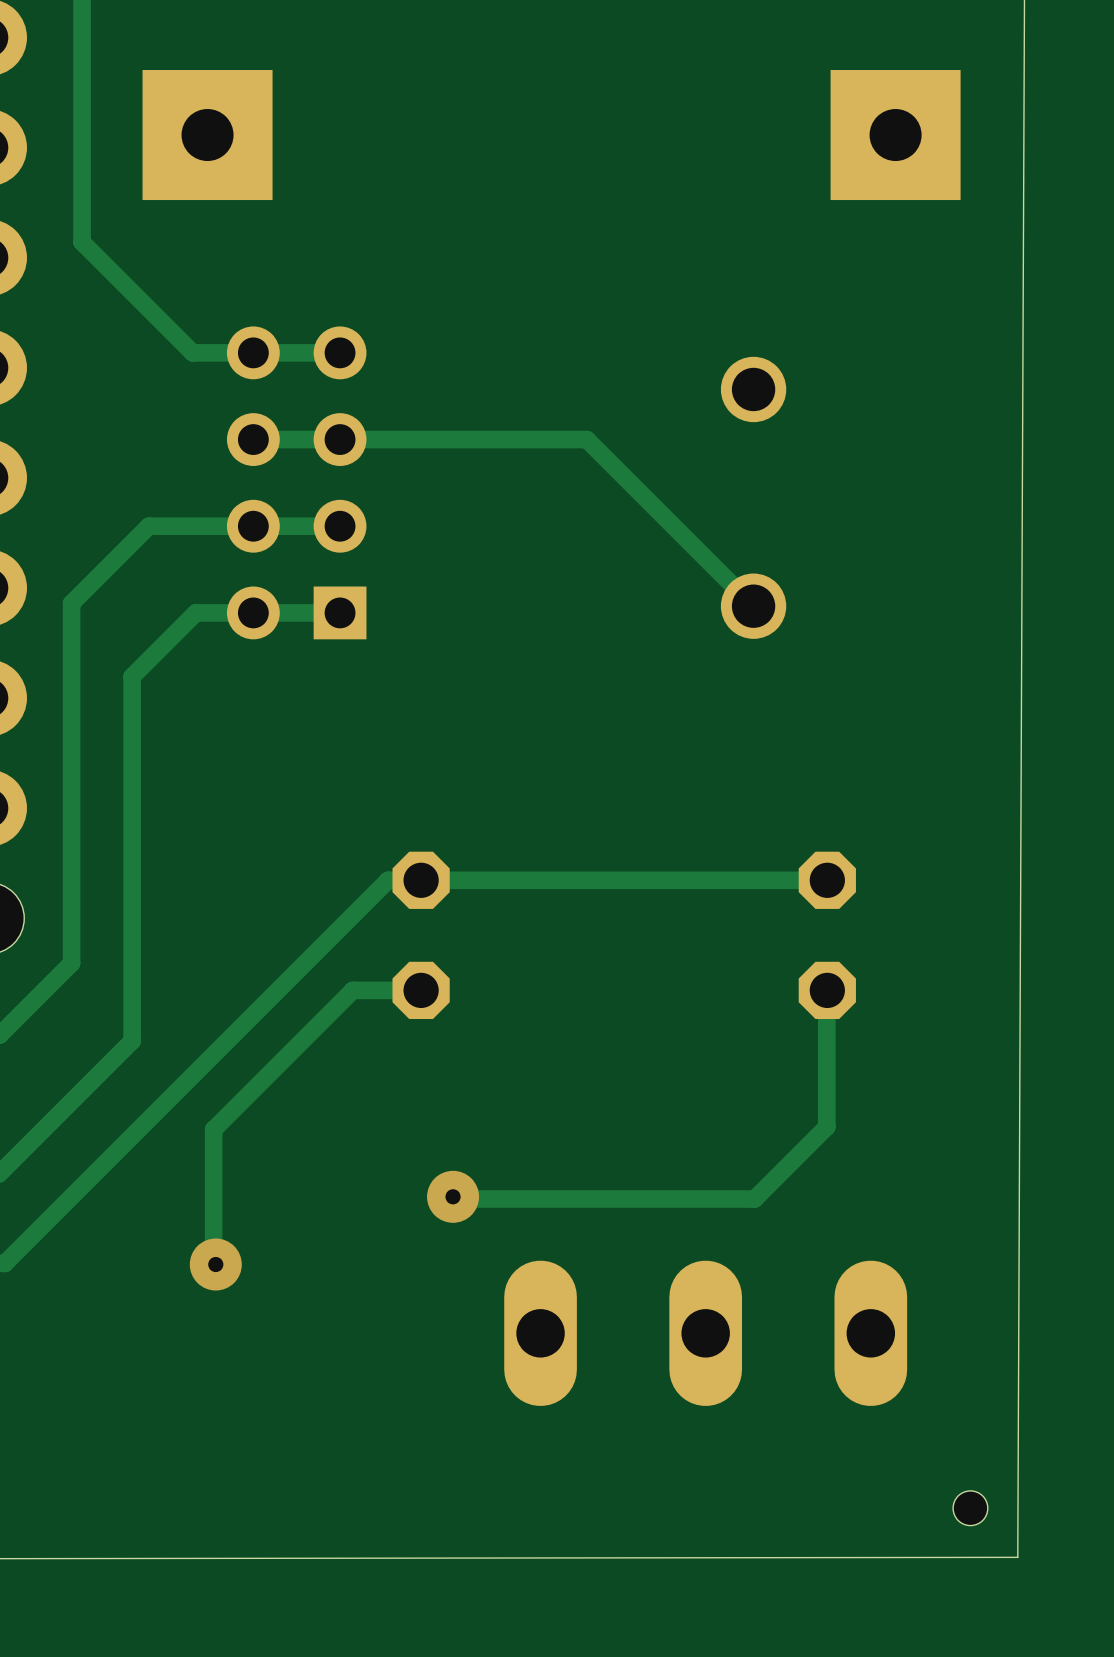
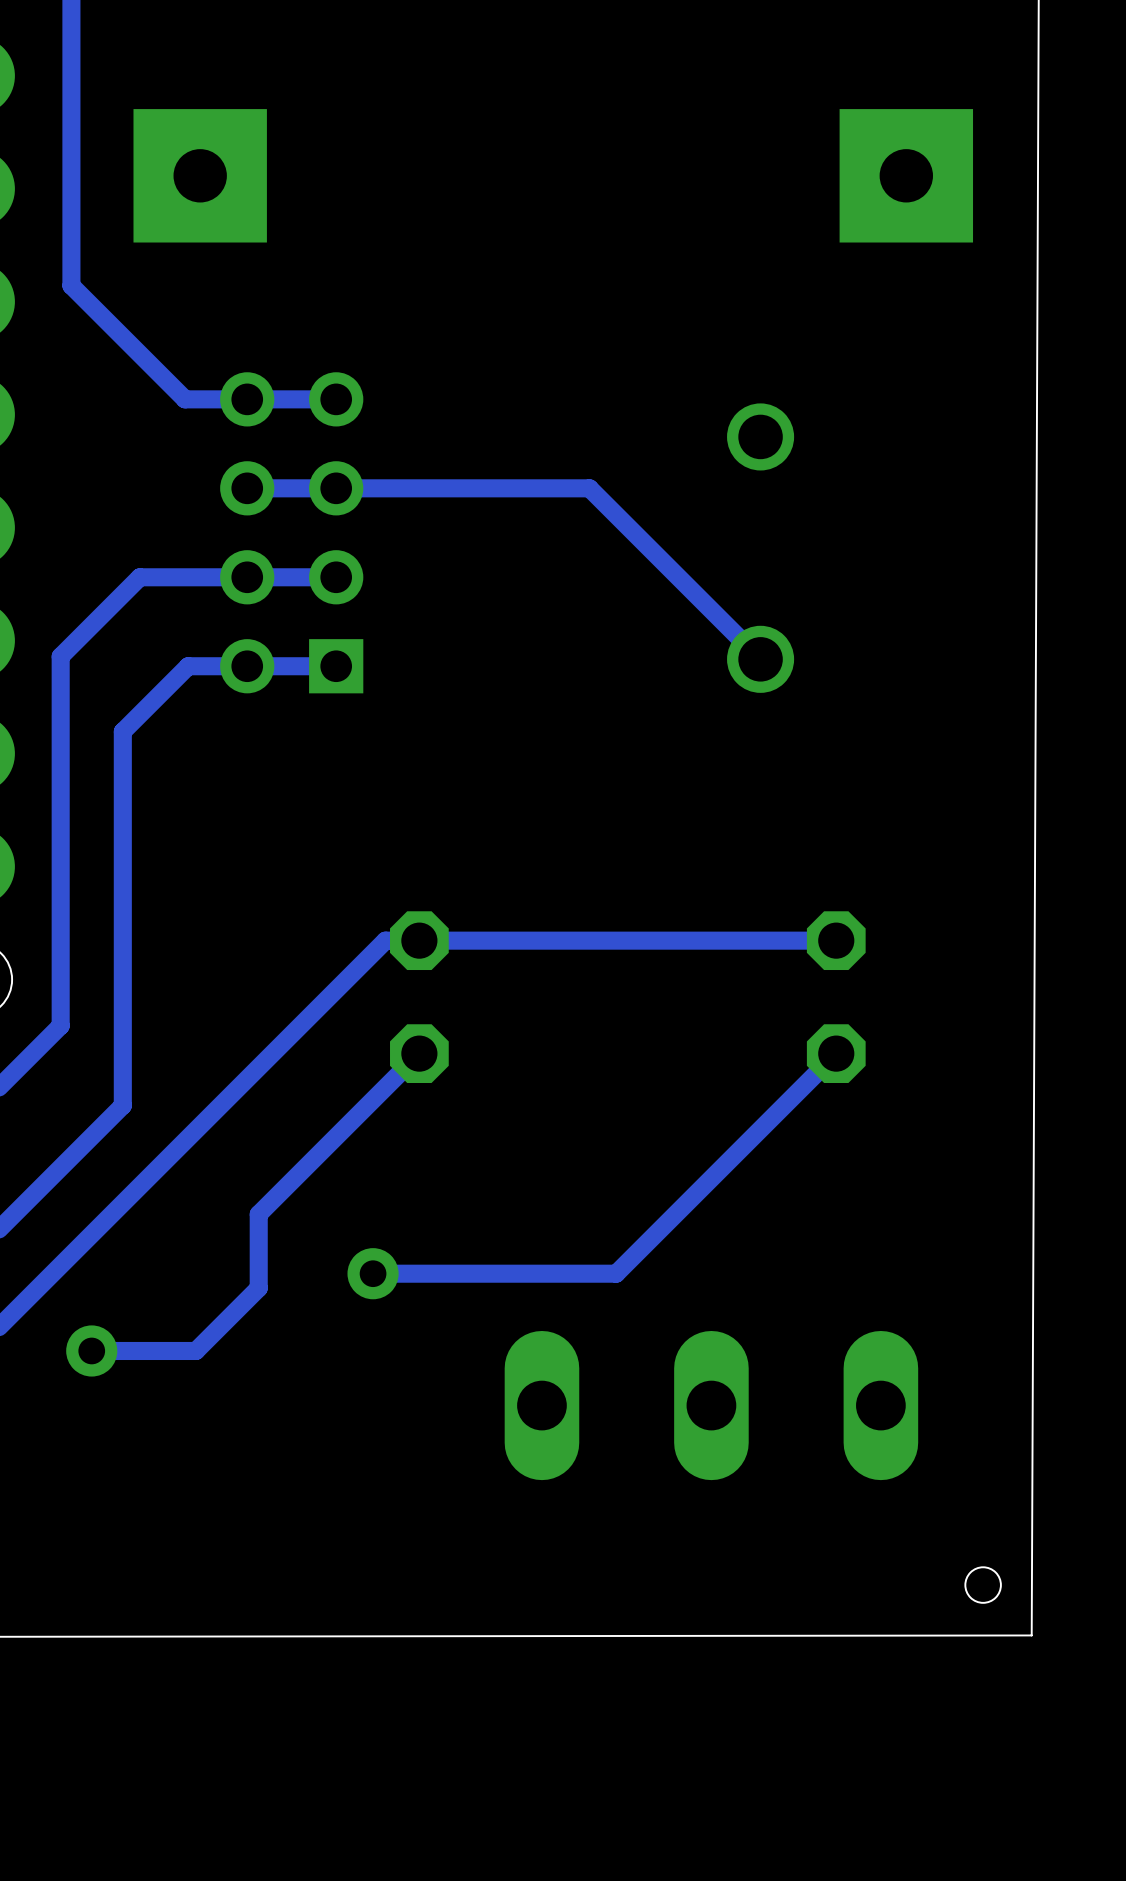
track: (421, 990) (352, 990) (213, 1129) (213, 1259) (215, 1264) -> (419, 1053) (258, 1214) (258, 1288) (195, 1350) (91, 1350)
track: (826, 990) (826, 1126) (754, 1199) (455, 1199) (453, 1196) -> (835, 1054) (616, 1273) (373, 1273)
via: (453, 1196) -> none
via: none -> (373, 1273)
via: (215, 1264) -> none
via: none -> (91, 1350)

